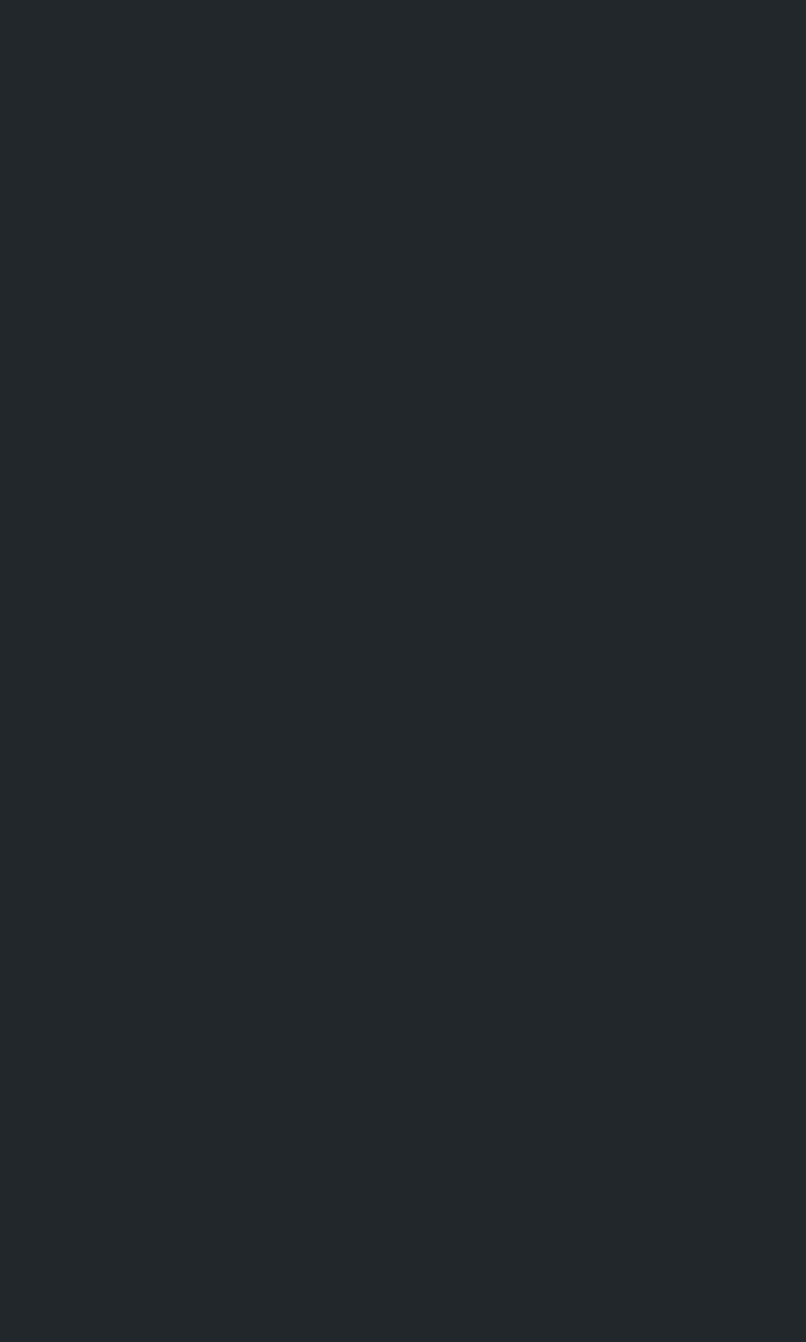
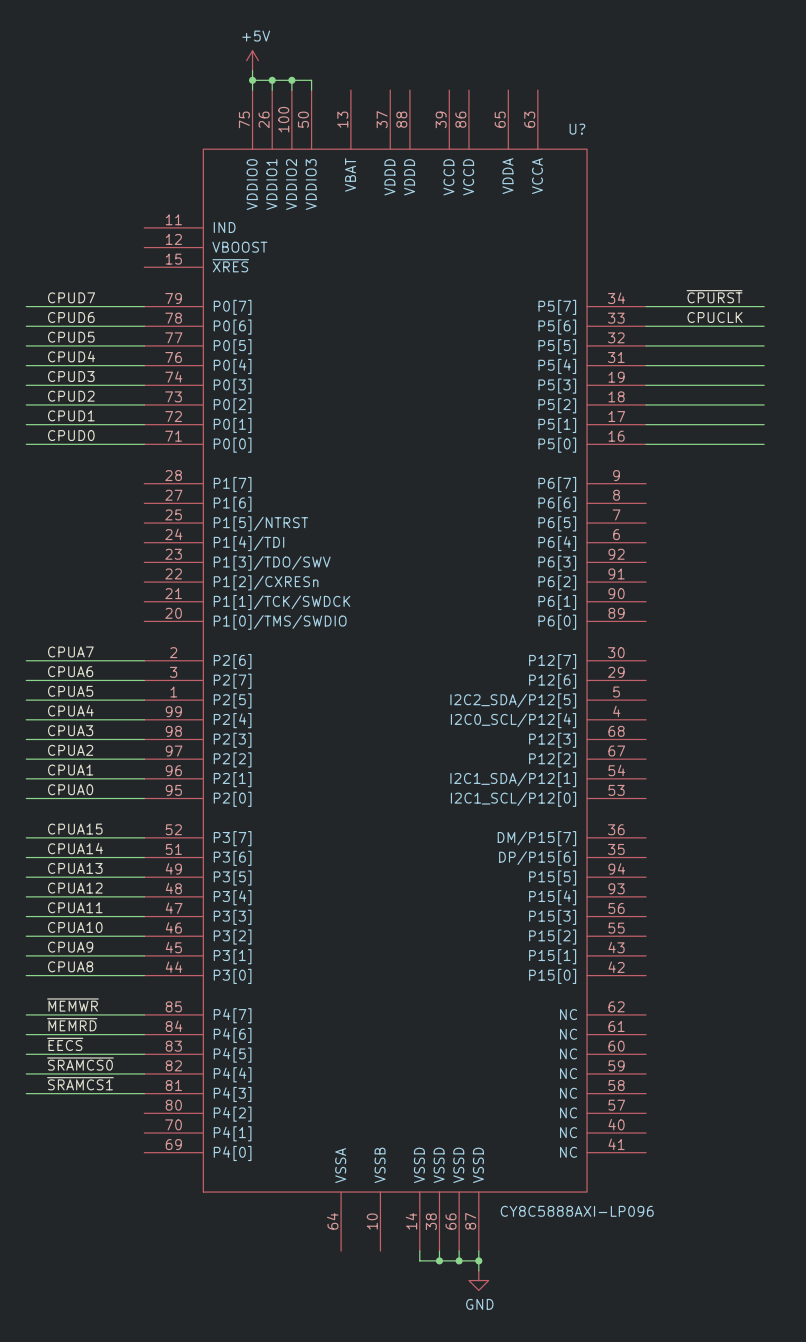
power symbol: none -> +5V (252, 60)
wire: none -> (252, 70) (252, 90)
wire: none -> (252, 80) (311, 80) (311, 90)
junction: none -> (252, 80)
wire: none -> (272, 80) (272, 90)
junction: none -> (272, 80)
wire: none -> (291, 80) (291, 90)
junction: none -> (291, 80)
label: none -> ~{CPURST} (714, 296)
label: none -> CPUD7 (71, 297)
wire: none -> (26, 306) (144, 306)
wire: none -> (646, 306) (764, 306)
label: none -> CPUD6 (71, 317)
label: none -> CPUCLK (715, 317)
wire: none -> (26, 326) (144, 326)
wire: none -> (646, 326) (764, 326)
label: none -> CPUD5 (71, 337)
wire: none -> (26, 345) (144, 345)
wire: none -> (646, 345) (764, 345)
label: none -> CPUD4 (71, 356)
wire: none -> (26, 365) (144, 365)
wire: none -> (646, 365) (764, 365)
label: none -> CPUD3 (71, 376)
wire: none -> (26, 385) (144, 385)
wire: none -> (646, 385) (764, 385)
label: none -> CPUD2 (71, 396)
wire: none -> (26, 404) (144, 404)
wire: none -> (646, 404) (764, 404)
label: none -> CPUD1 (71, 415)
wire: none -> (26, 424) (144, 424)
wire: none -> (646, 424) (764, 424)
label: none -> CPUD0 (71, 435)
wire: none -> (26, 444) (144, 444)
wire: none -> (646, 444) (764, 444)
label: none -> CPUA7 (70, 651)
wire: none -> (26, 660) (144, 660)
U?: none -> CY8C5888AXI-LP096 (395, 670)
label: none -> CPUA6 (70, 671)
wire: none -> (26, 680) (144, 680)
label: none -> CPUA5 (70, 691)
wire: none -> (26, 700) (144, 700)
label: none -> CPUA4 (70, 710)
wire: none -> (26, 719) (144, 719)
label: none -> CPUA3 (70, 730)
wire: none -> (26, 739) (144, 739)
label: none -> CPUA2 (70, 750)
wire: none -> (26, 759) (144, 759)
label: none -> CPUA1 (70, 770)
wire: none -> (26, 778) (144, 778)
label: none -> CPUA0 (70, 789)
wire: none -> (26, 798) (144, 798)
label: none -> CPUA15 (75, 829)
wire: none -> (26, 837) (144, 837)
label: none -> CPUA14 (75, 848)
wire: none -> (26, 857) (144, 857)
label: none -> CPUA13 (75, 868)
wire: none -> (26, 877) (144, 877)
label: none -> CPUA12 (75, 888)
wire: none -> (26, 896) (144, 896)
label: none -> CPUA11 (75, 907)
wire: none -> (26, 916) (144, 916)
label: none -> CPUA10 (75, 927)
wire: none -> (26, 936) (144, 936)
label: none -> CPUA9 (70, 947)
wire: none -> (26, 955) (144, 955)
label: none -> CPUA8 (70, 966)
wire: none -> (26, 975) (144, 975)
label: none -> ~{MEMWR} (72, 1005)
wire: none -> (26, 1014) (144, 1014)
label: none -> ~{MEMRD} (72, 1024)
wire: none -> (26, 1034) (144, 1034)
label: none -> ~{EECS} (65, 1044)
wire: none -> (26, 1054) (144, 1054)
label: none -> ~{SRAMCS0} (80, 1064)
wire: none -> (26, 1073) (144, 1073)
label: none -> ~{SRAMCS1} (80, 1083)
wire: none -> (26, 1093) (144, 1093)
wire: none -> (419, 1251) (419, 1260) (478, 1260)
wire: none -> (439, 1251) (439, 1260)
wire: none -> (459, 1251) (459, 1260)
wire: none -> (478, 1251) (478, 1270)
junction: none -> (439, 1260)
junction: none -> (459, 1260)
junction: none -> (478, 1260)
power symbol: none -> GND (478, 1280)

